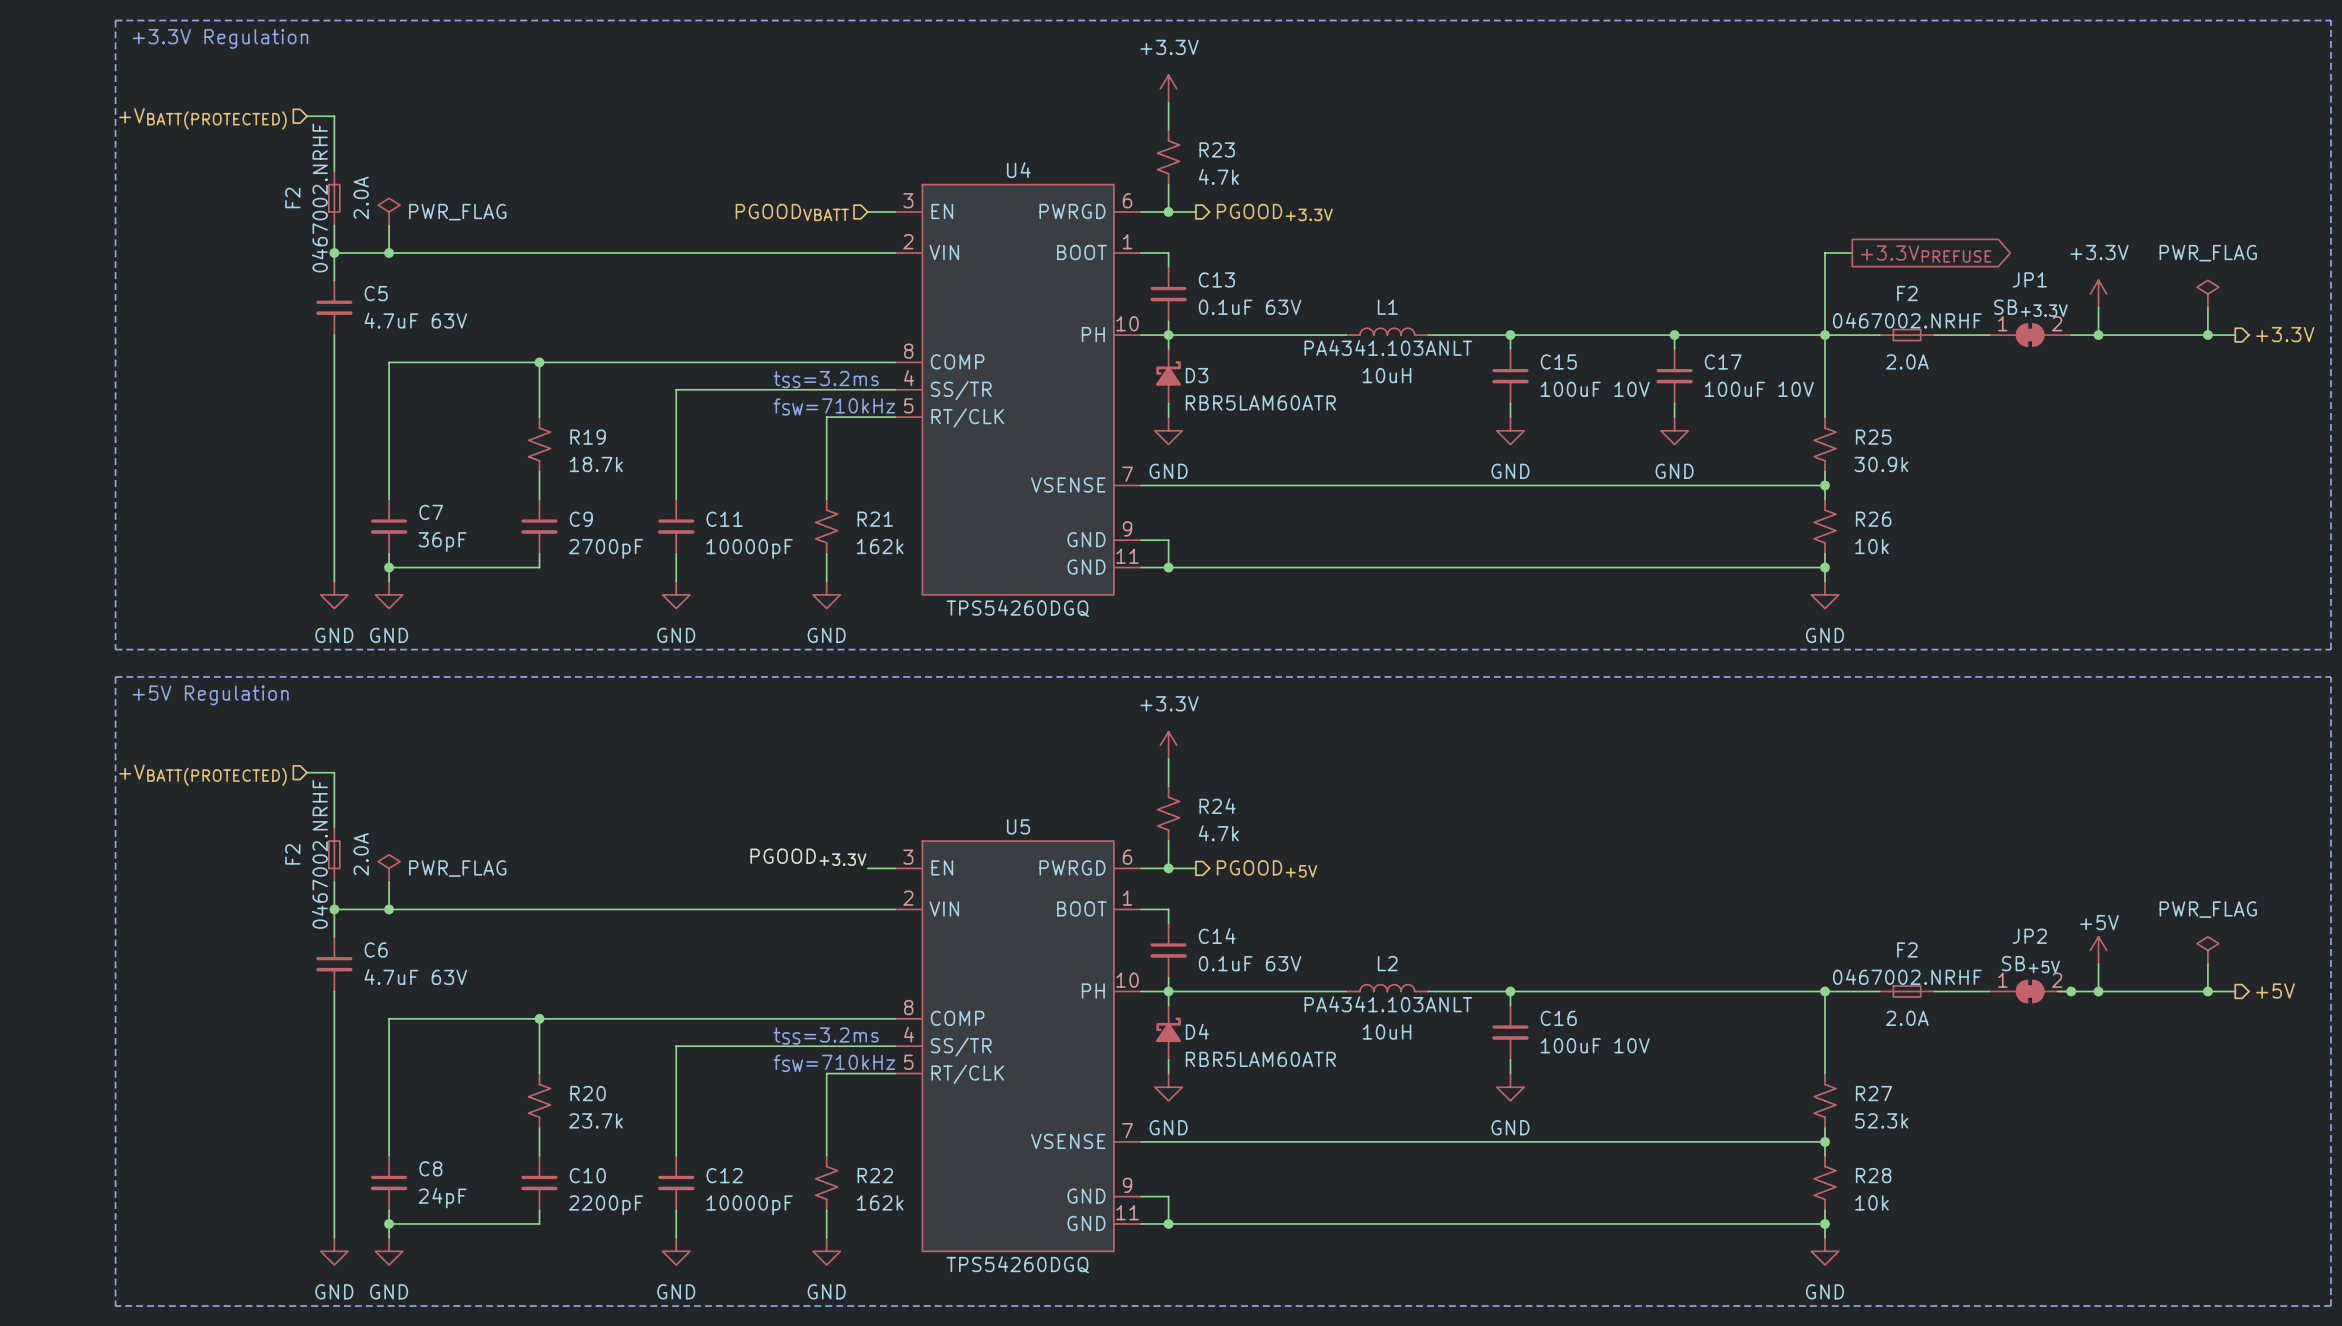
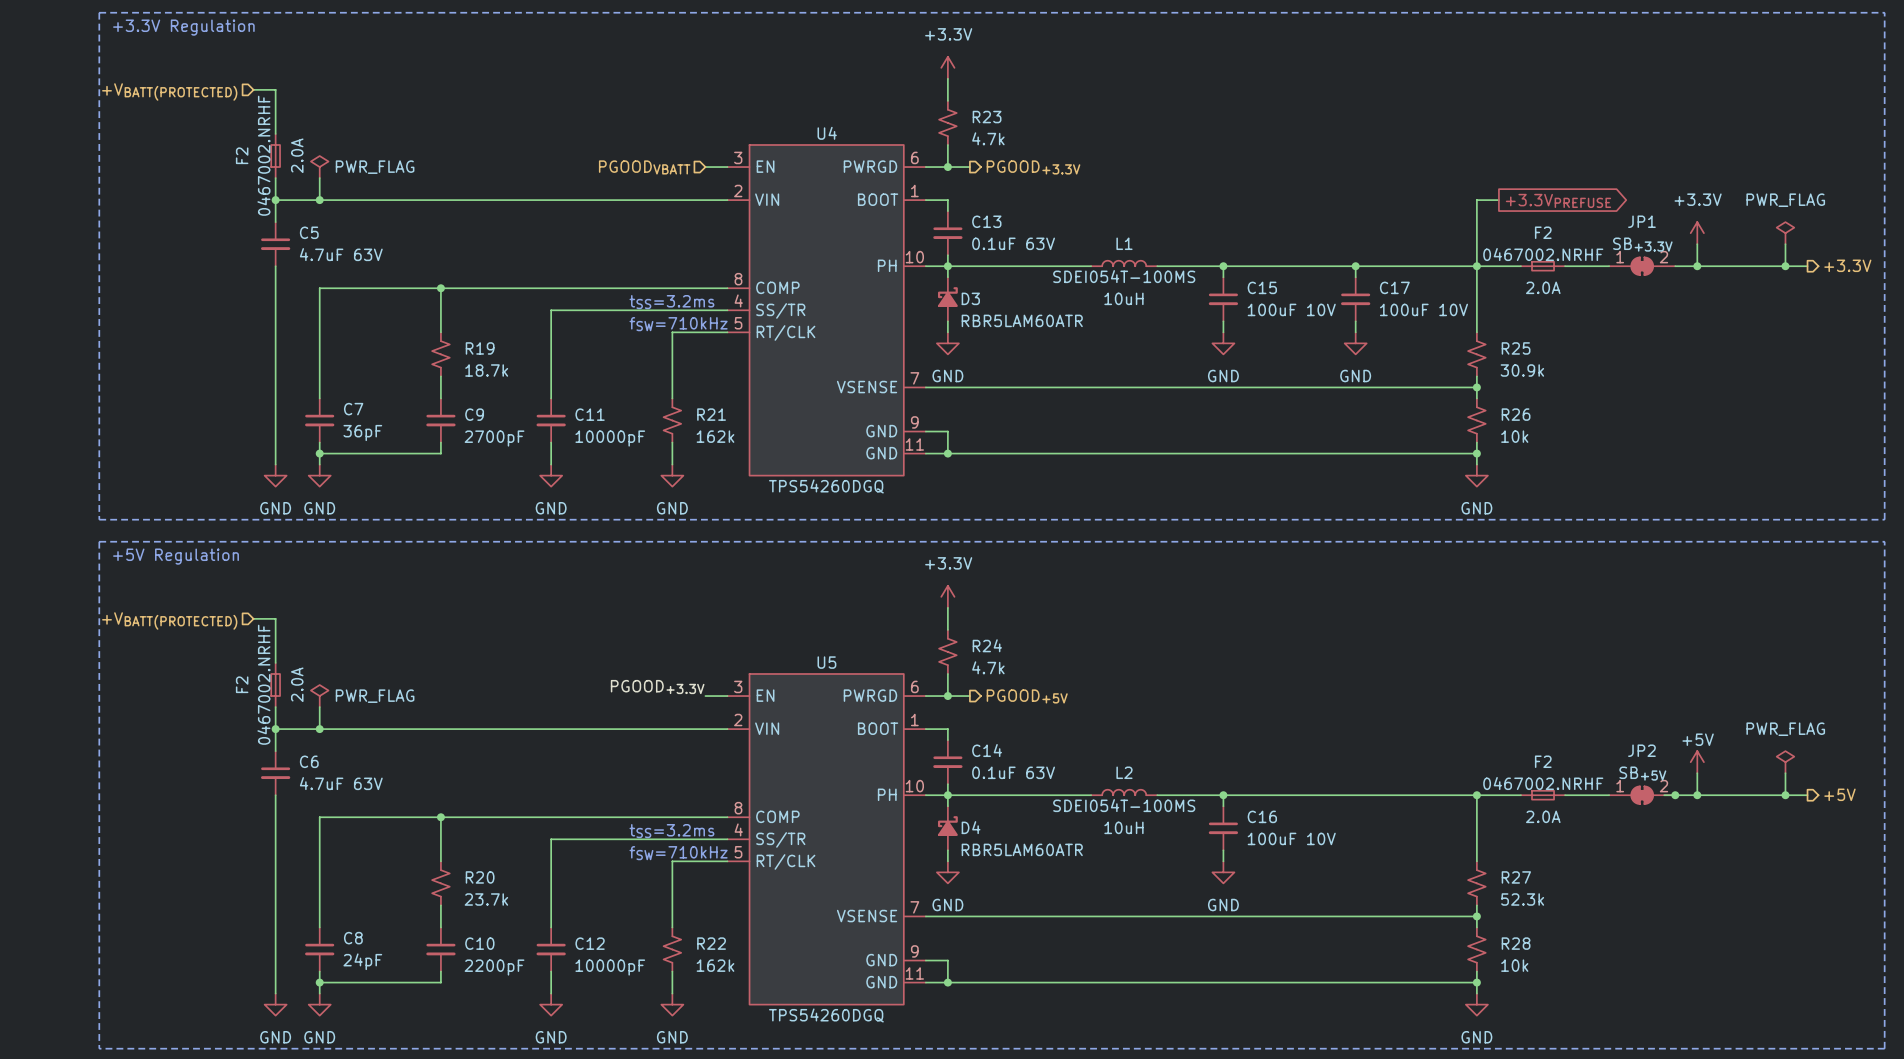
L1 value: PA4341.103ANLT (1388, 347) -> SDEI054T-100MS (1124, 276)
L2 value: PA4341.103ANLT (1388, 1004) -> SDEI054T-100MS (1124, 805)

